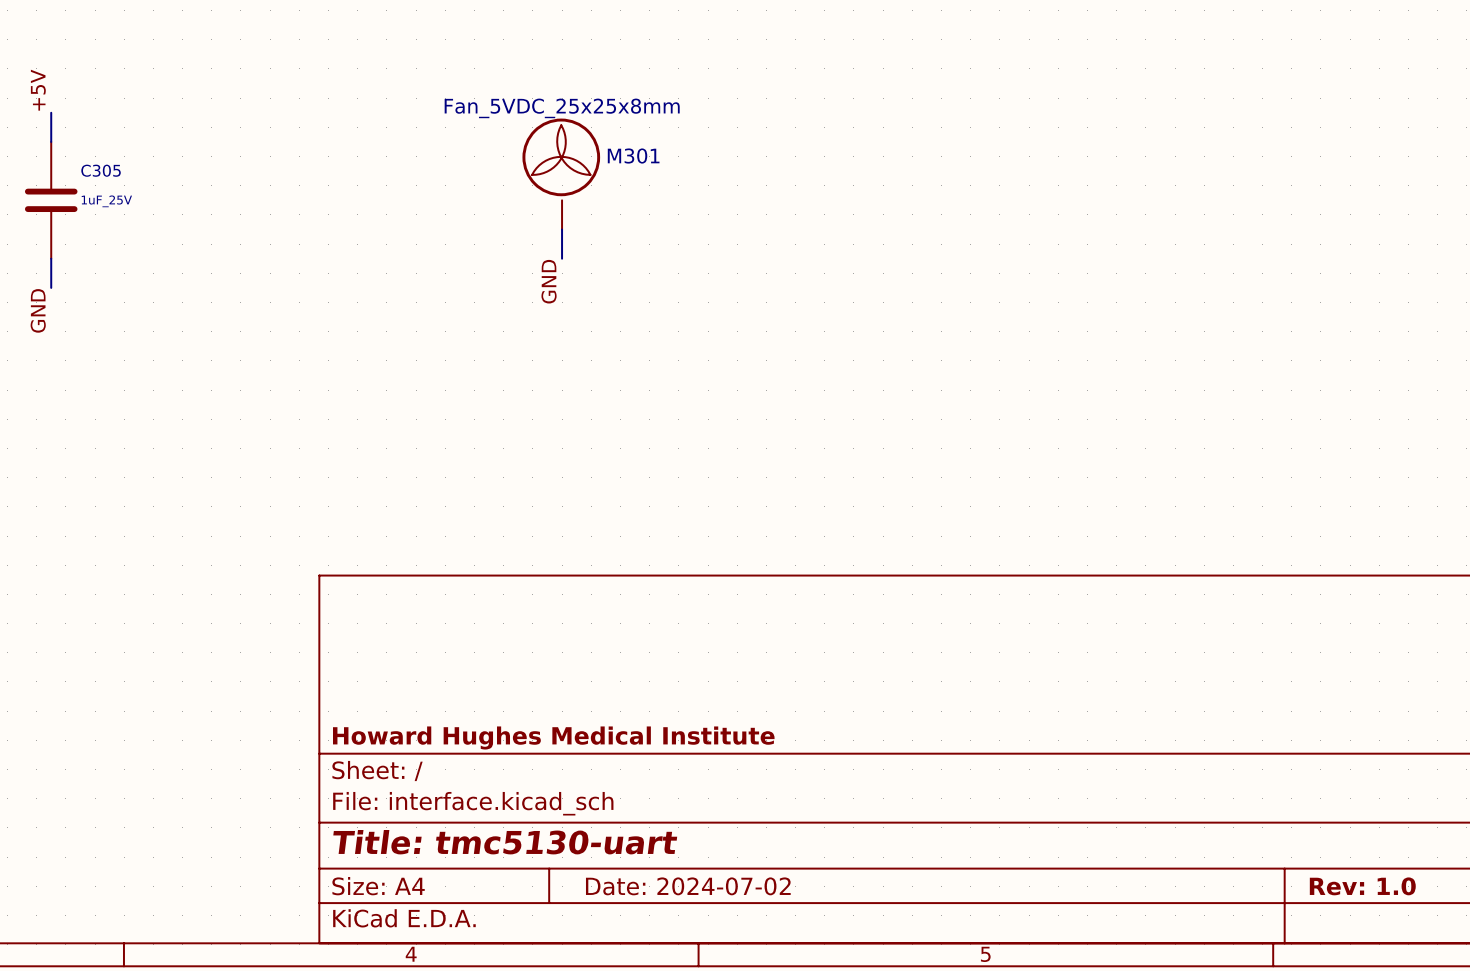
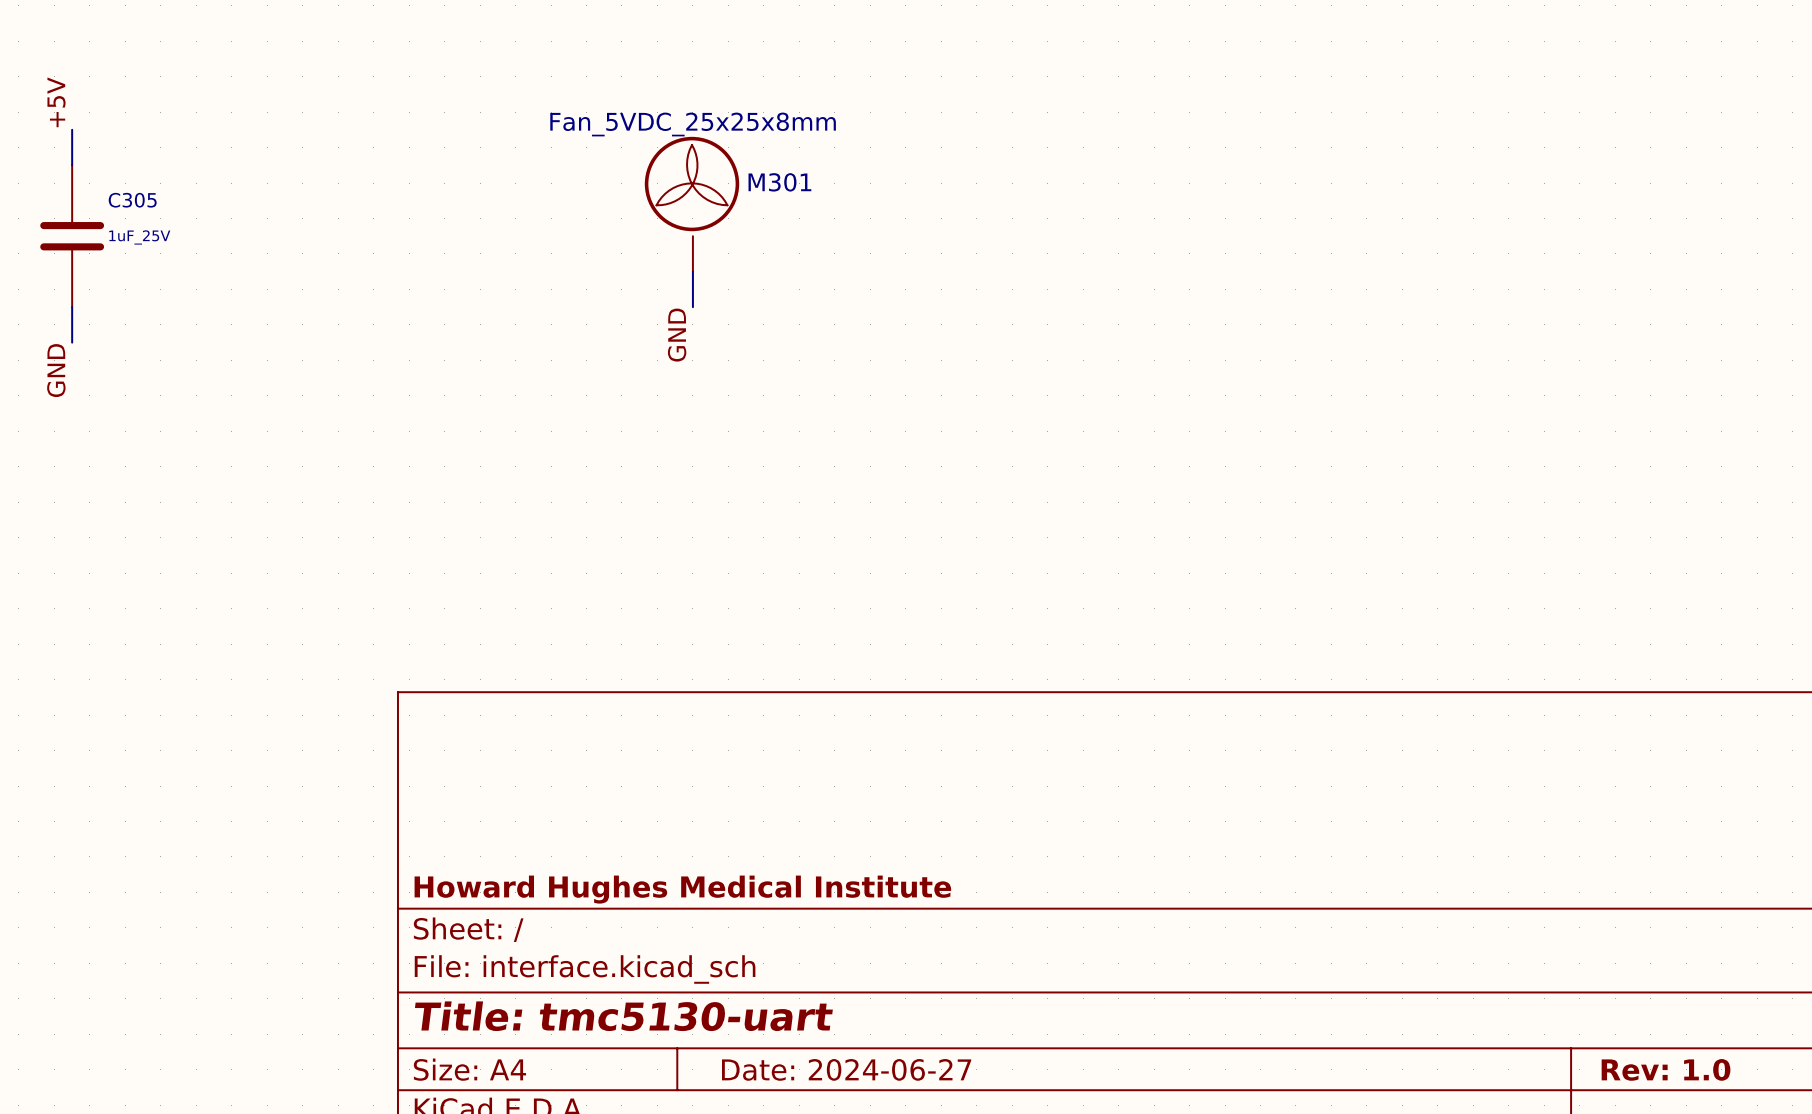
title block: Date: 2024-07-02 (688, 886) -> Date: 2024-06-27 (846, 1069)

